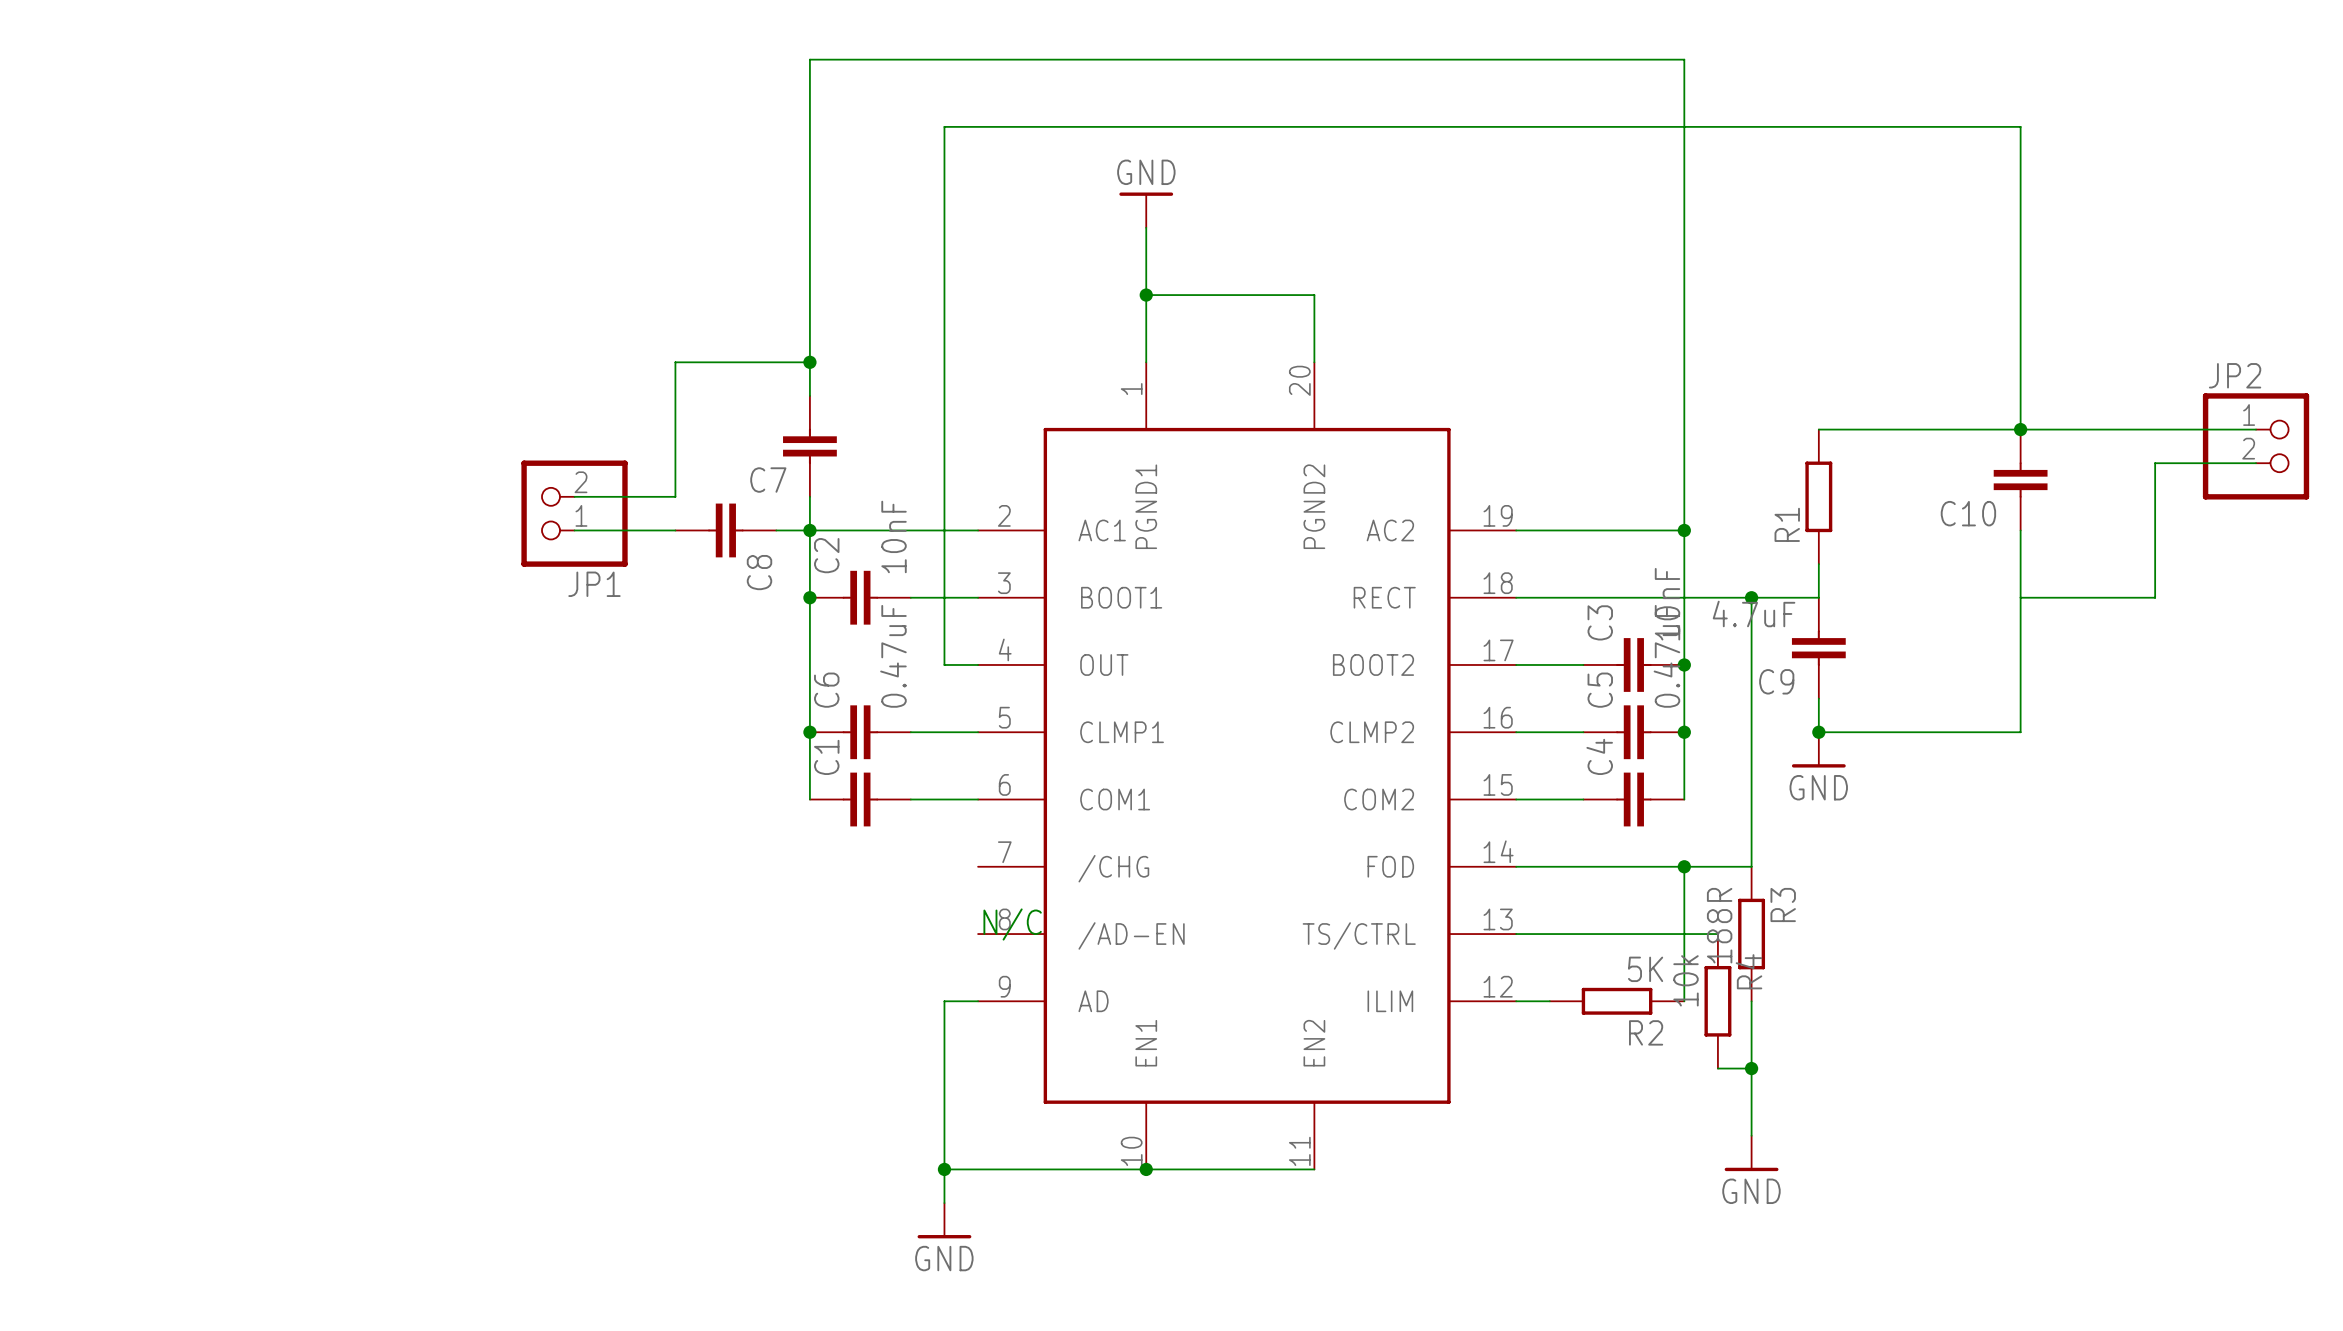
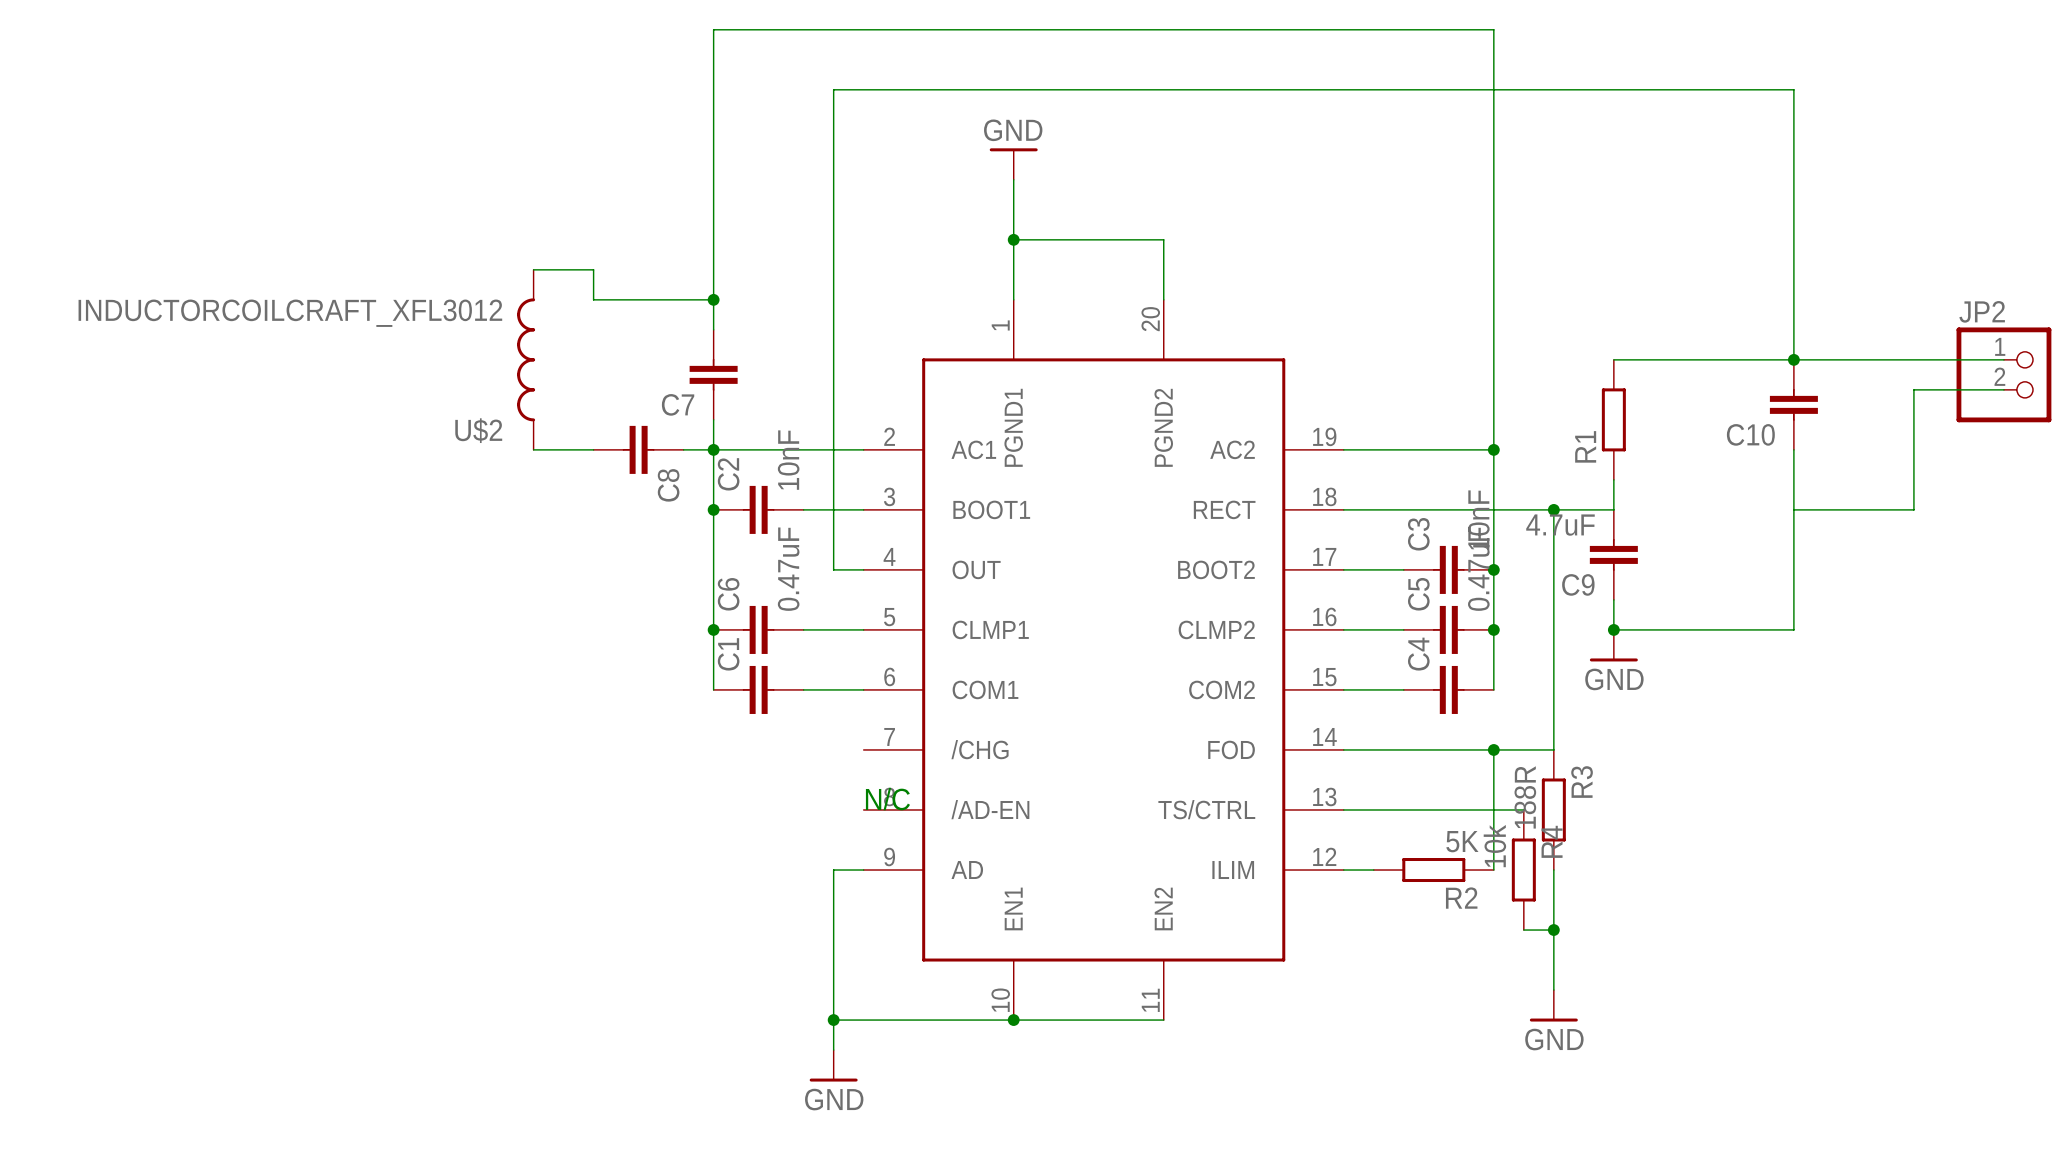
wire: (675, 362) (675, 496) (574, 496) -> (593, 299) (593, 269) (533, 269)
U$2: none -> INDUCTORCOILCRAFT_XFL3012 (526, 359)
JP1: (574, 513) -> none
wire: (574, 530) (608, 530) -> none

